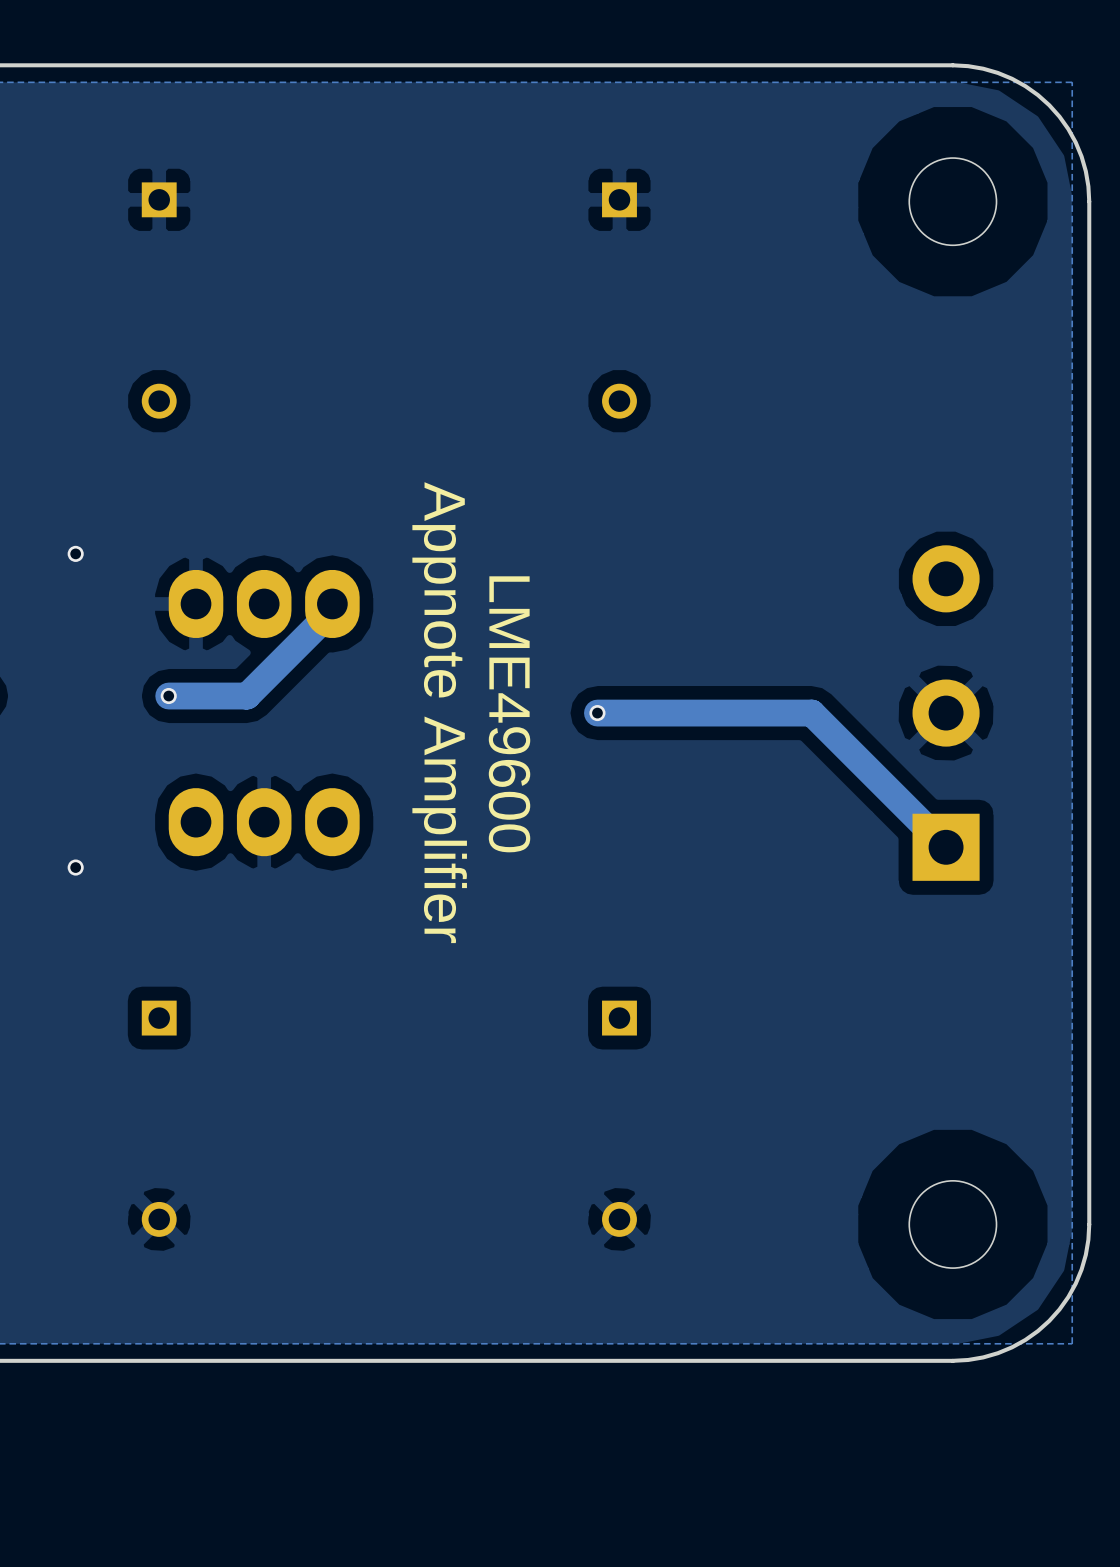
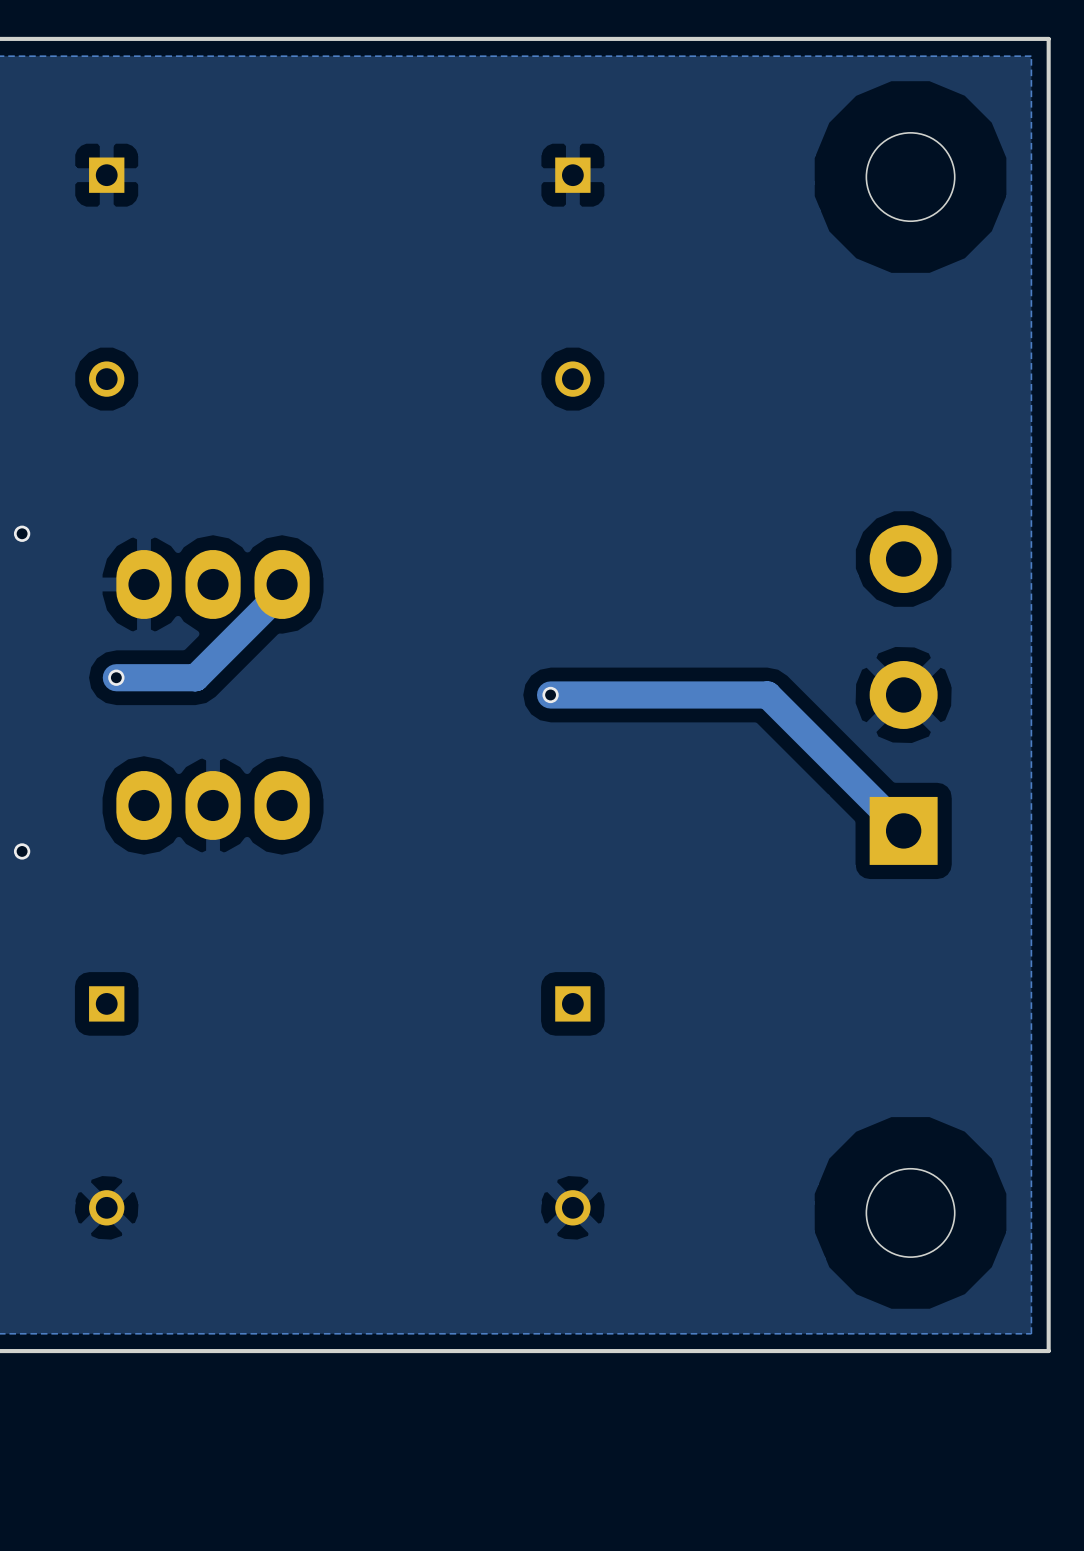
board edge: (952, 65) (983, 68) (997, 72) (1025, 86) (1049, 105) (1068, 129) (1075, 142) (1085, 171) (1089, 201) -> (910, 38) (1048, 38) (1048, 177)
text: Appnote Amplifier (439, 712) -> none
text: LME49600 (509, 714) -> none
board edge: (1089, 1224) (1085, 1254) (1075, 1283) (1059, 1309) (1049, 1320) (1025, 1339) (997, 1353) (983, 1357) (952, 1360) -> (1048, 1212) (1048, 1351) (910, 1351)

